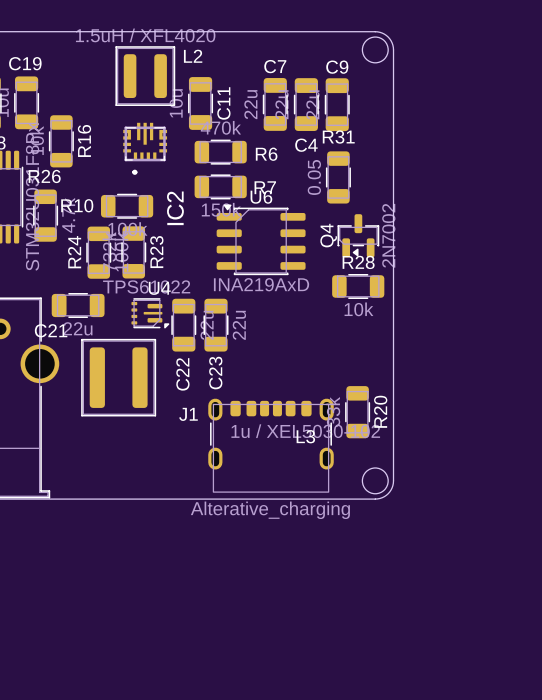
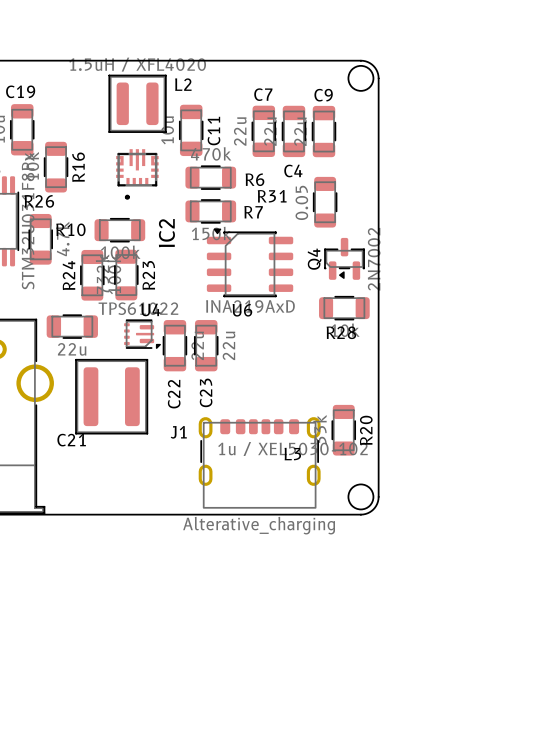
R31 name position: R31 (338, 137) -> R31 (272, 196)
U6 name position: U6 (261, 197) -> U6 (242, 310)
R28 name position: R28 (358, 262) -> R28 (341, 332)
C21 name position: C21 (51, 330) -> C21 (71, 440)

